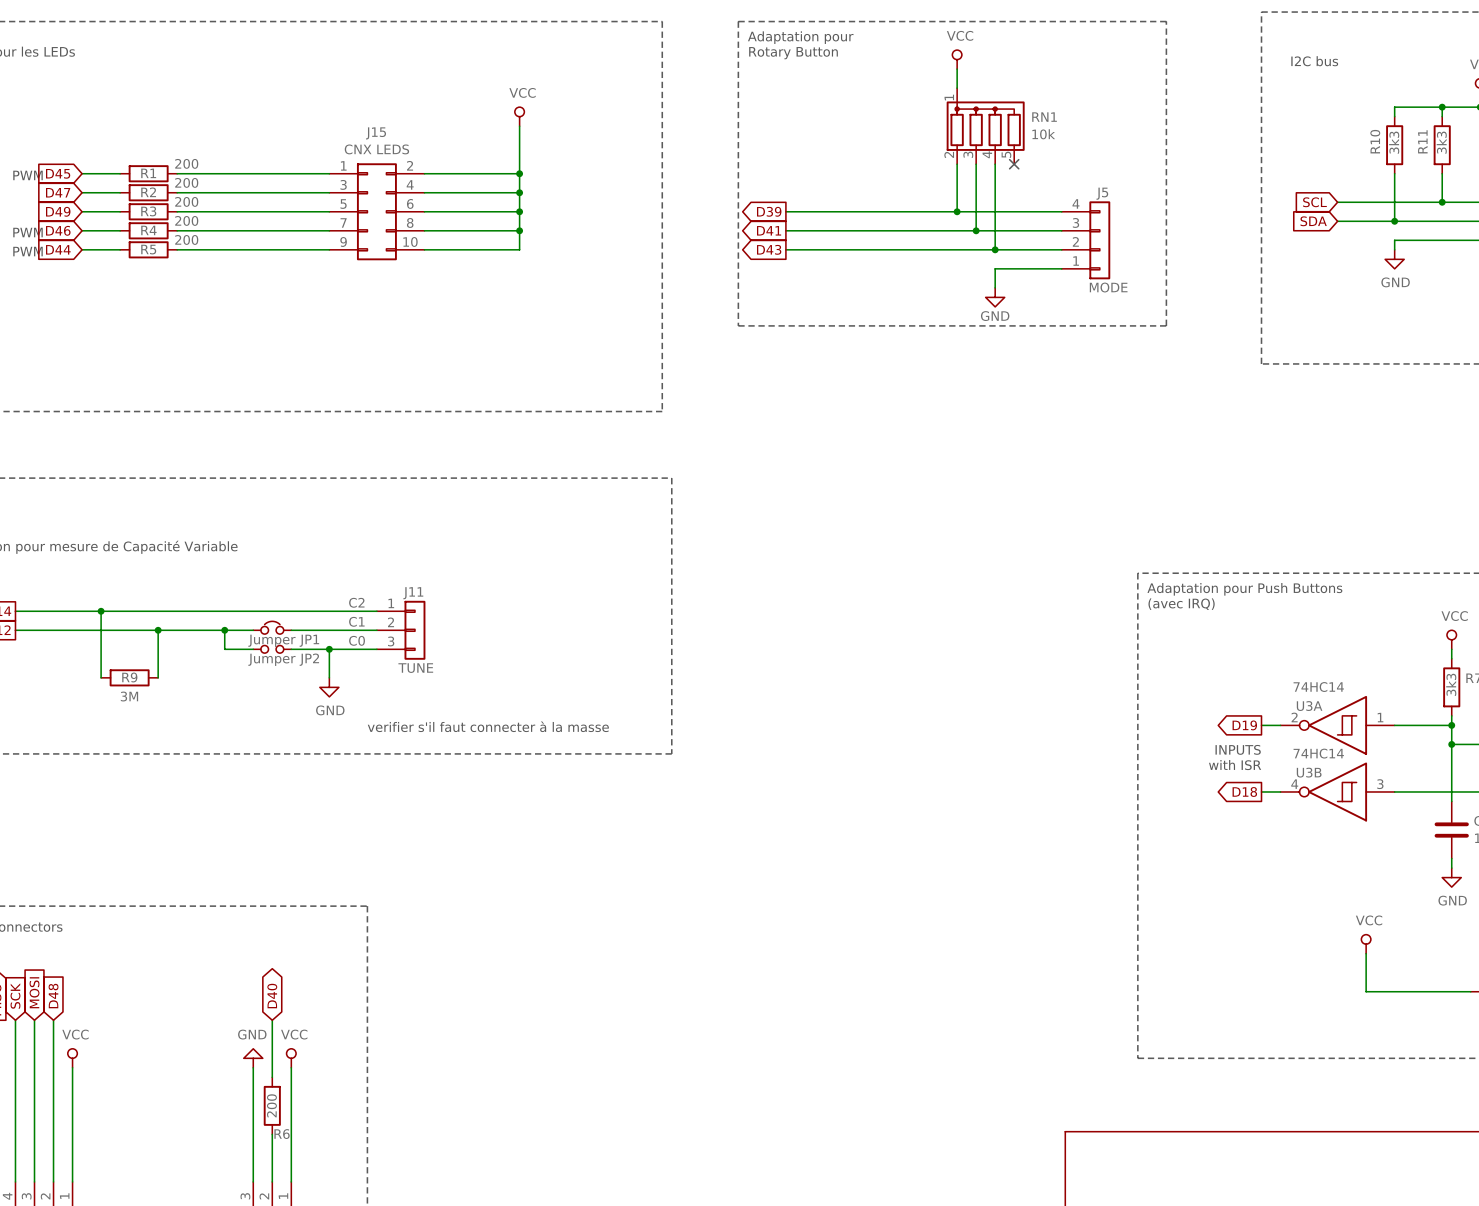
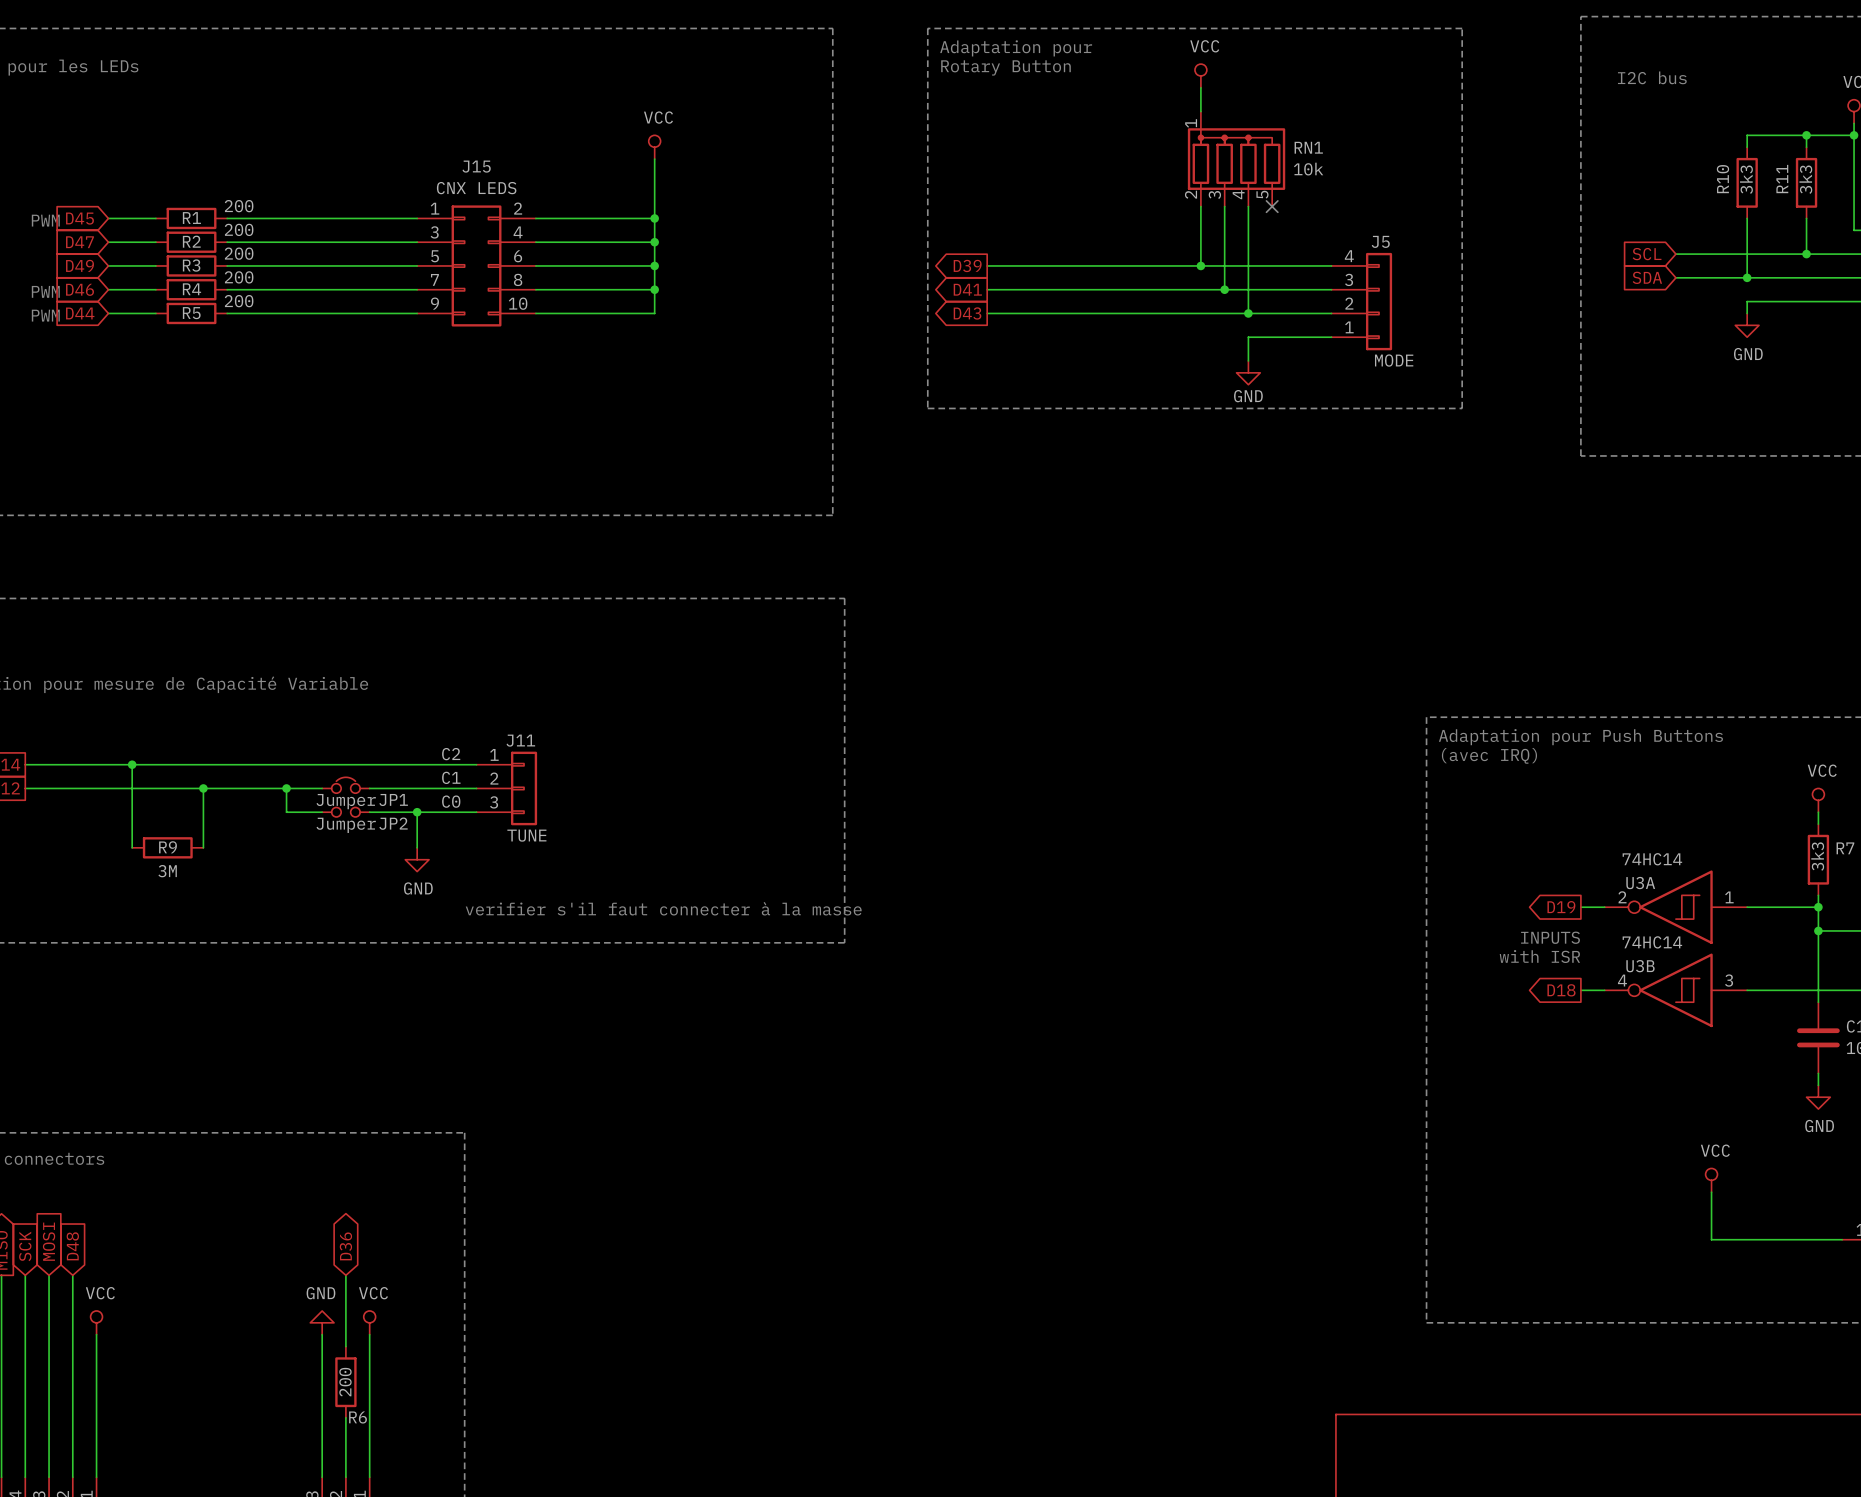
global label: D40 (272, 996) -> D36 (345, 1246)

